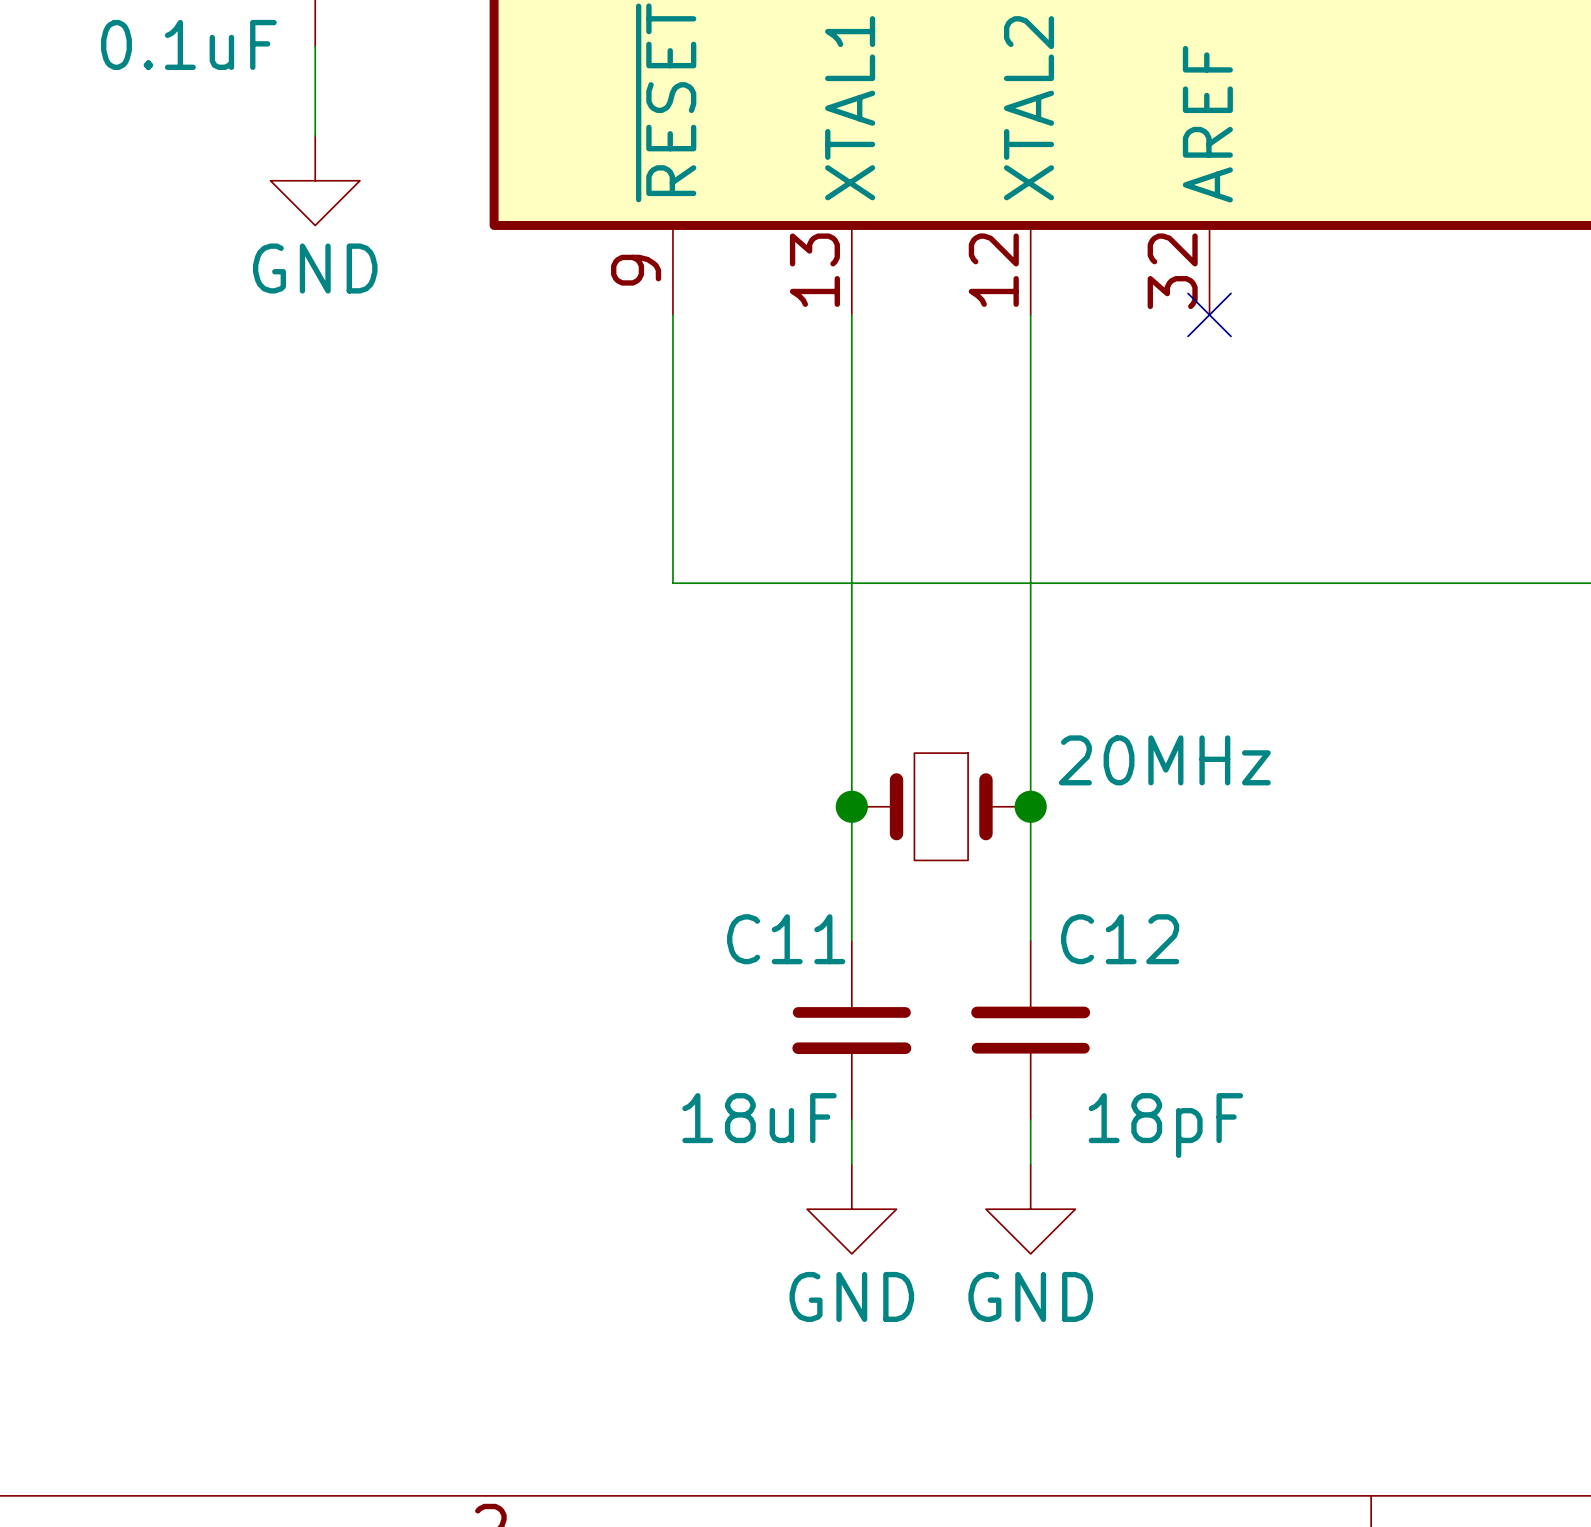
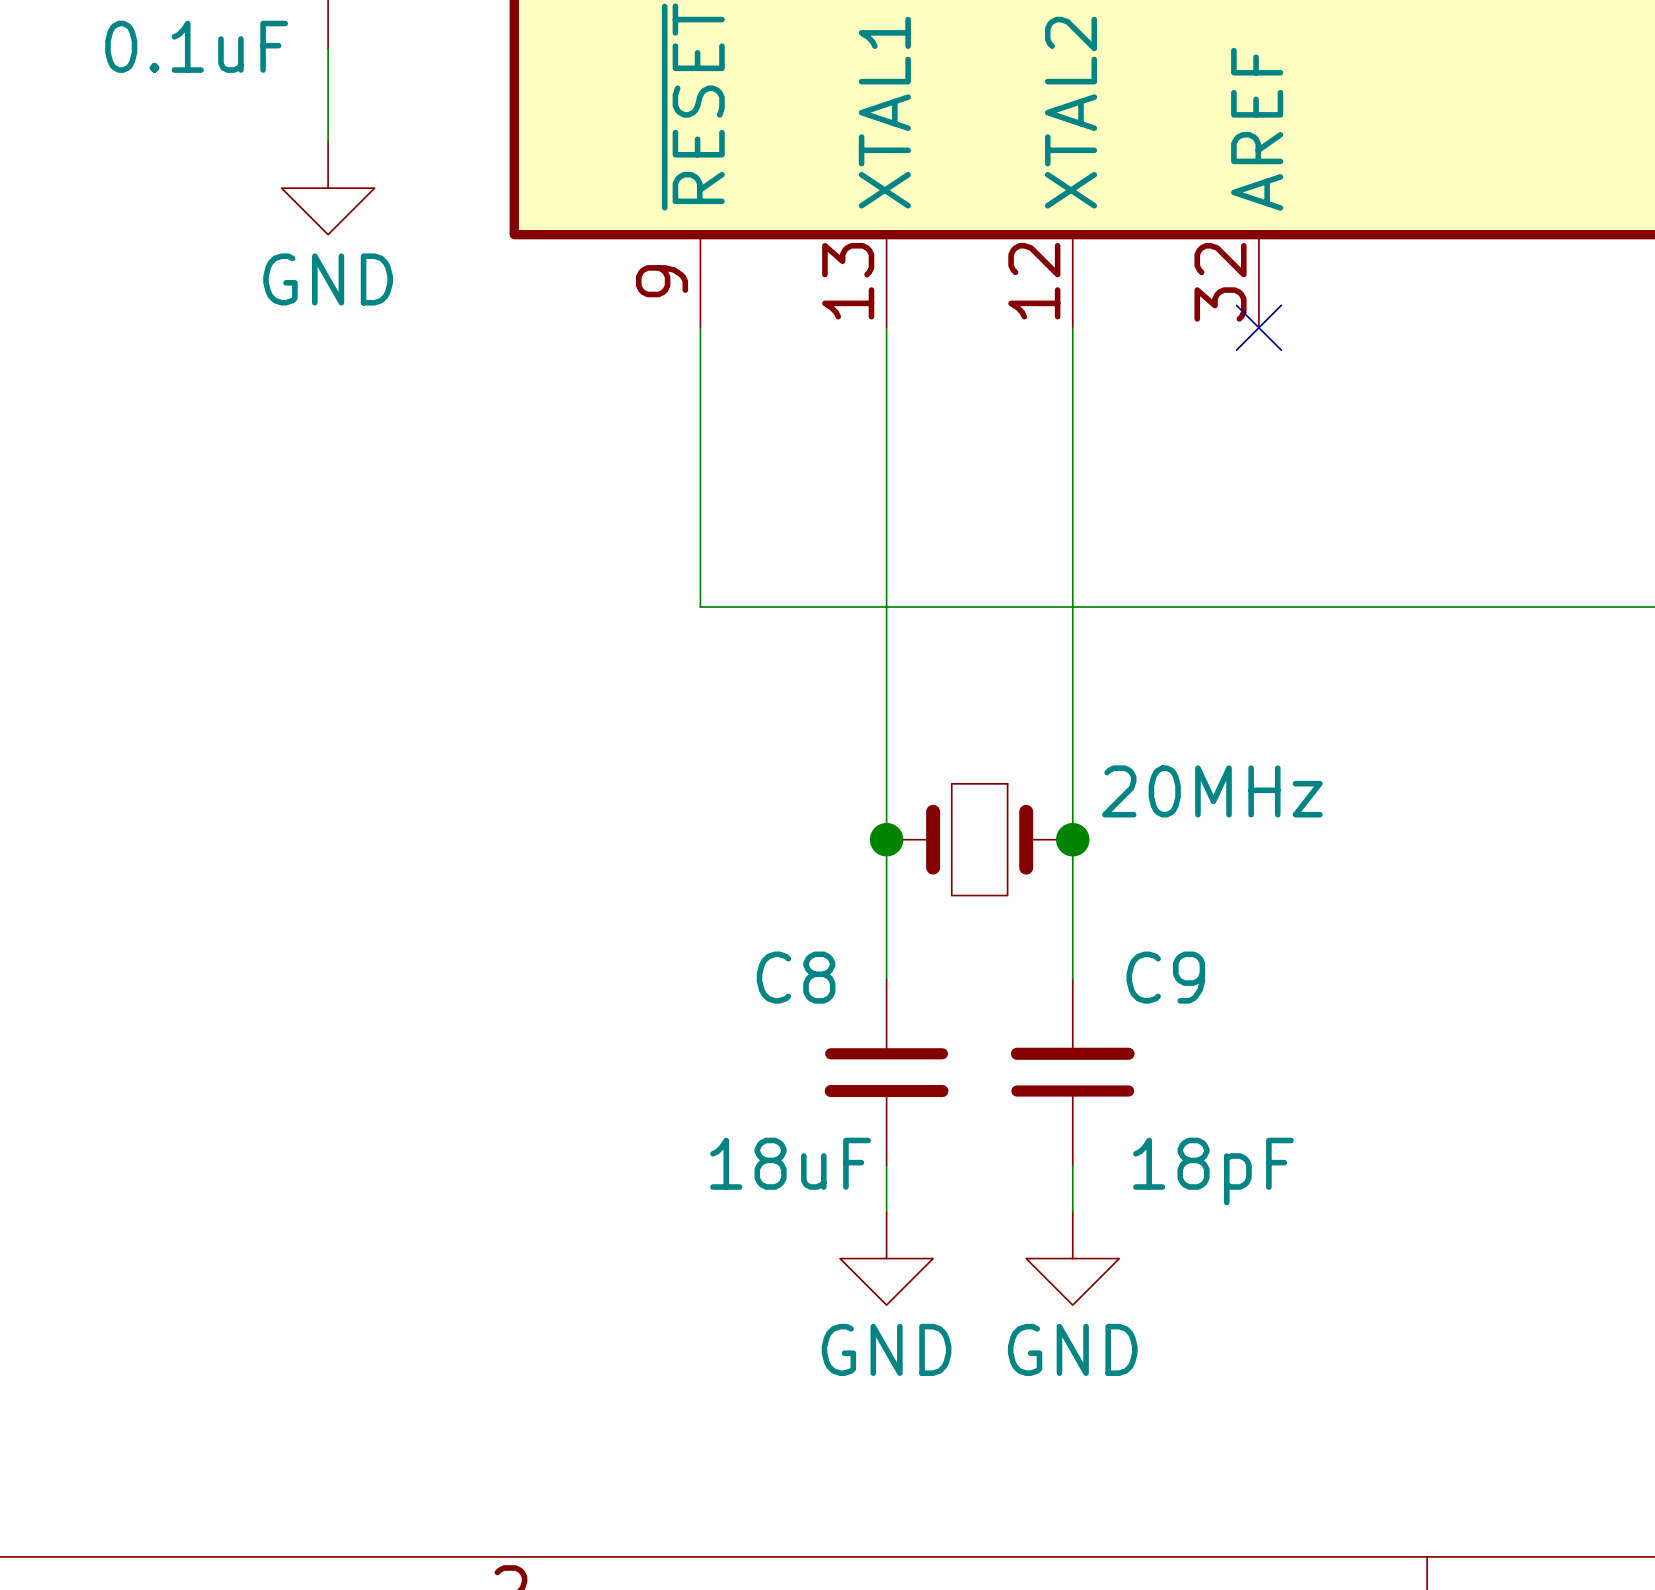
C11 name: C11 (786, 939) -> C8 (796, 977)
C12 name: C12 (1120, 939) -> C9 (1165, 977)

